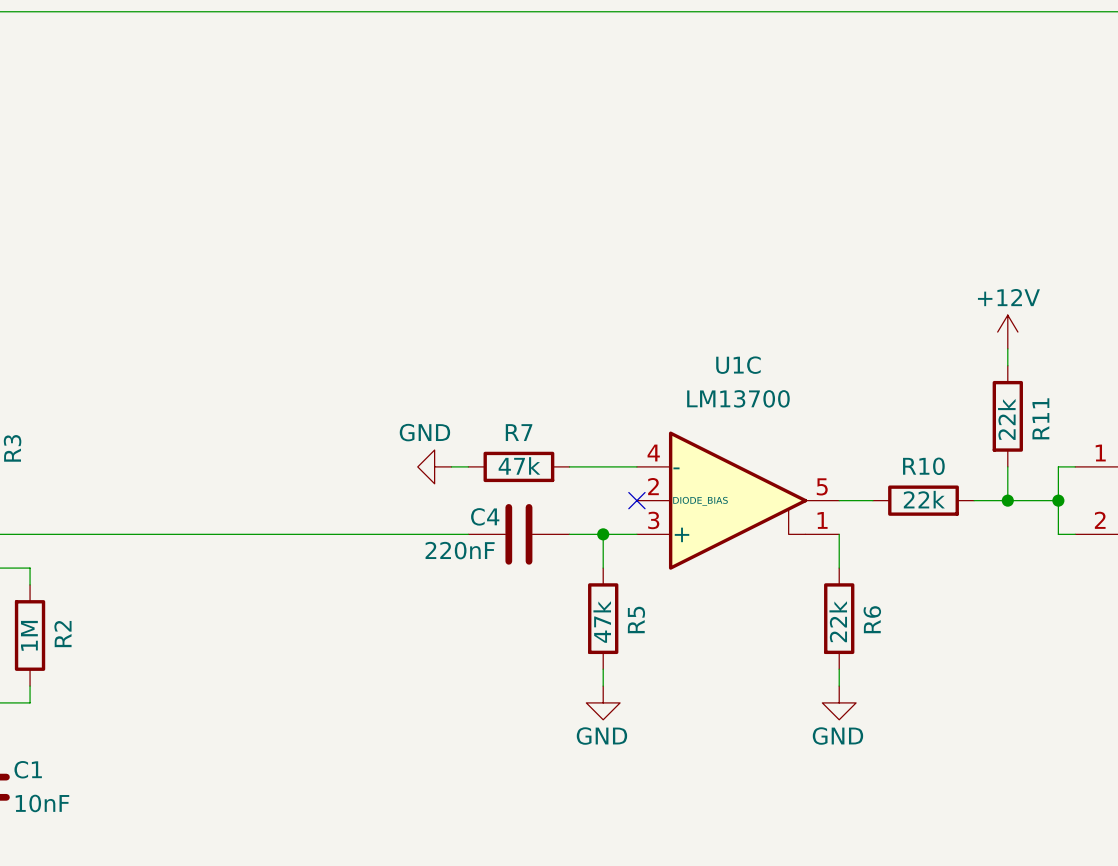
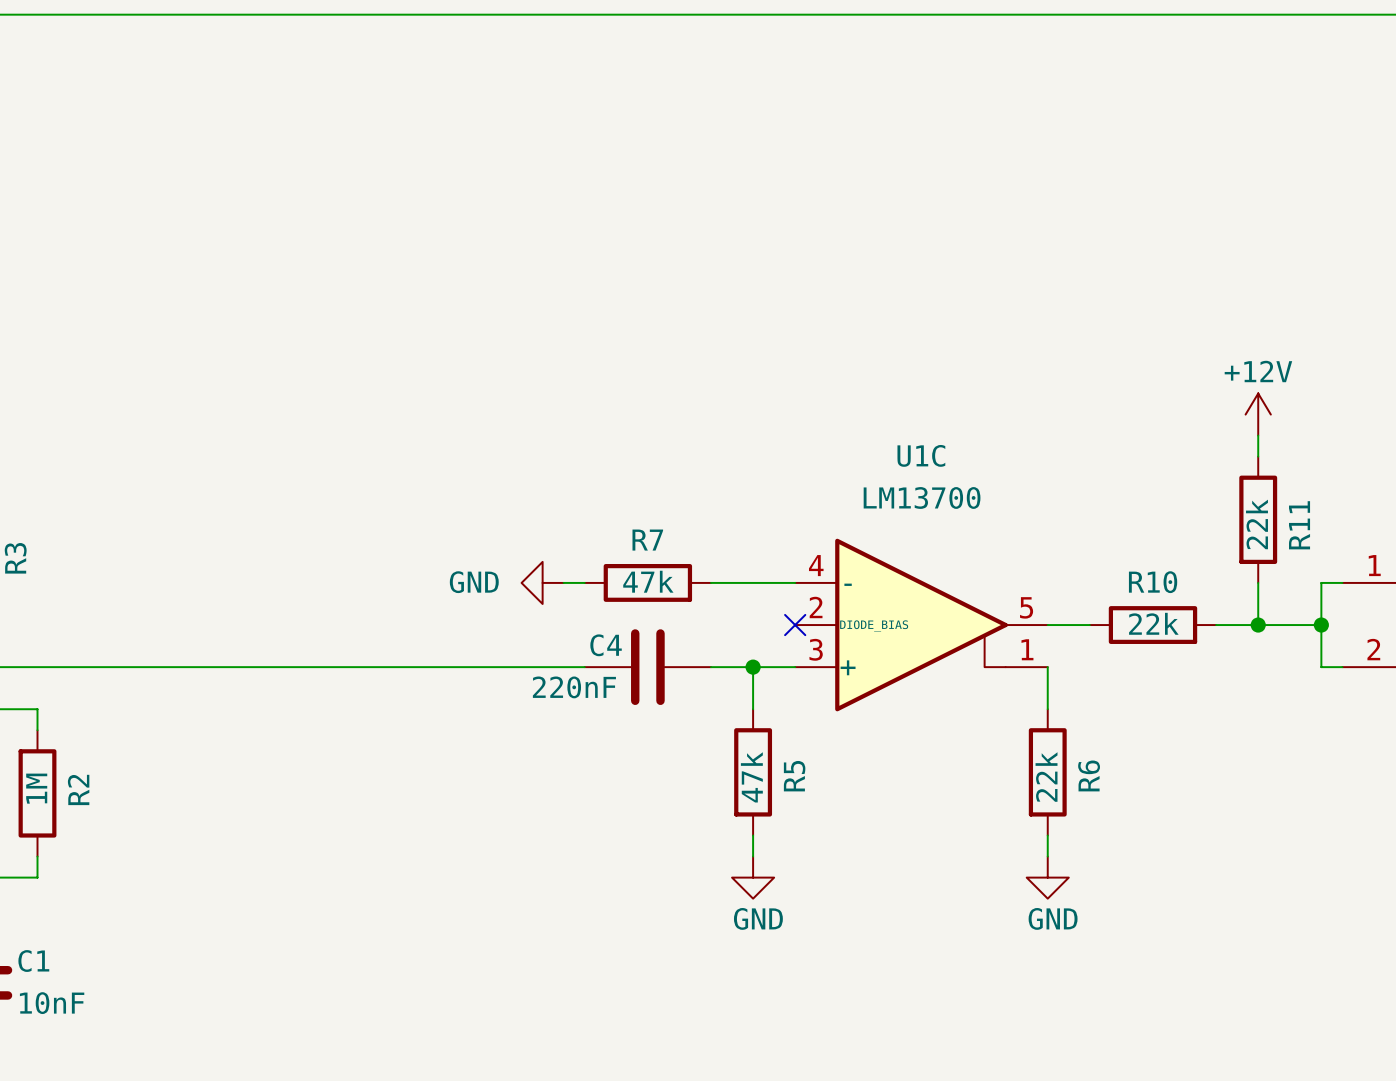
power symbol text position: GND (424, 432) -> GND (474, 582)

